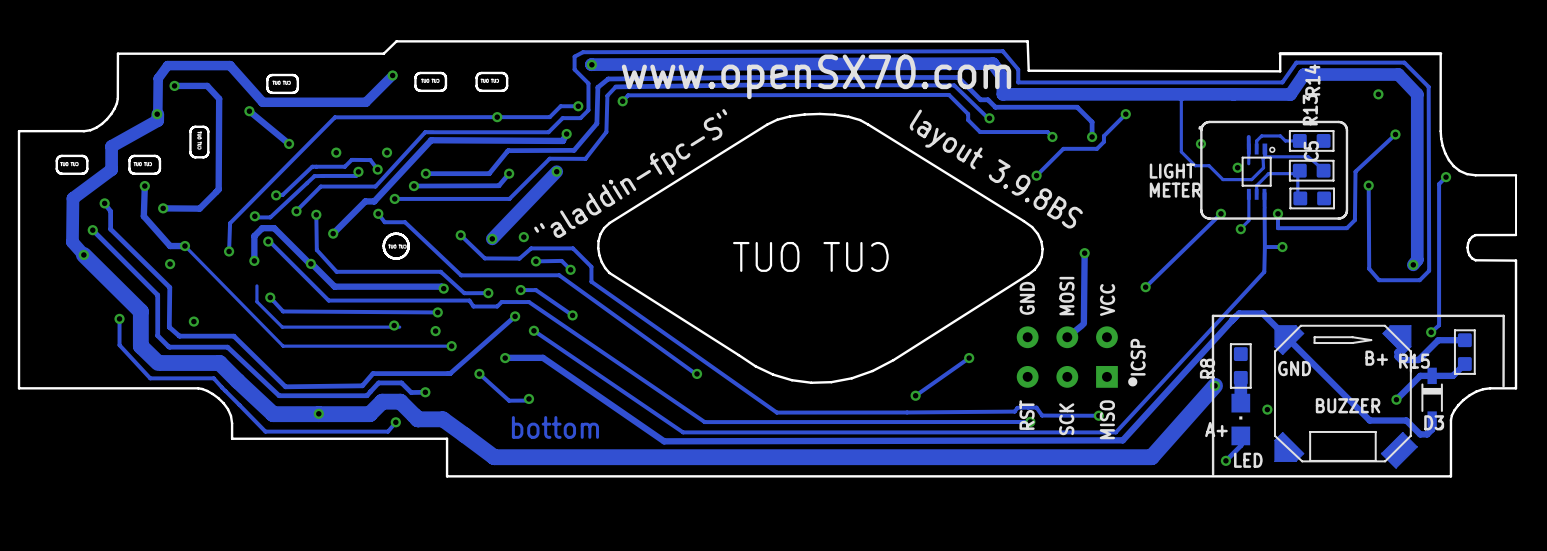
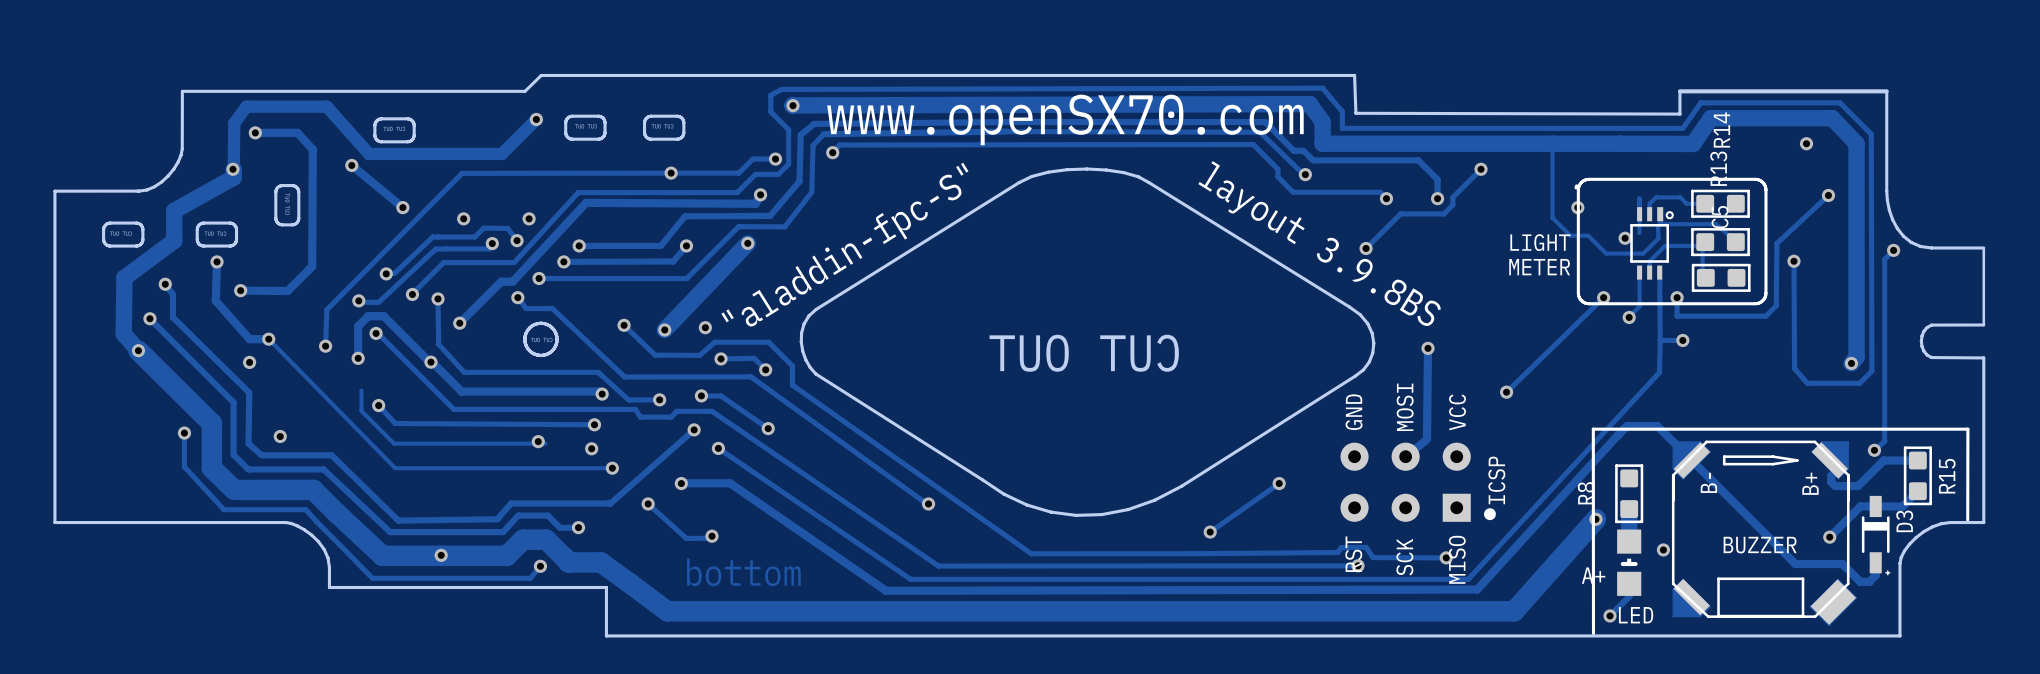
text rotation: 0° (1376, 358) -> 90° counterclockwise (1810, 483)
text: none -> B- (1708, 482)
R15 name rotation: 0° (1414, 361) -> 90° counterclockwise (1947, 476)
R15 name position: R15 (1414, 361) -> R15 (1947, 476)
text: GND (1294, 368) -> none
line: none -> (1635, 564) (1622, 564)
D3 name rotation: 0° (1434, 422) -> 90° counterclockwise (1904, 521)
D3 name position: D3 (1434, 422) -> D3 (1904, 521)

